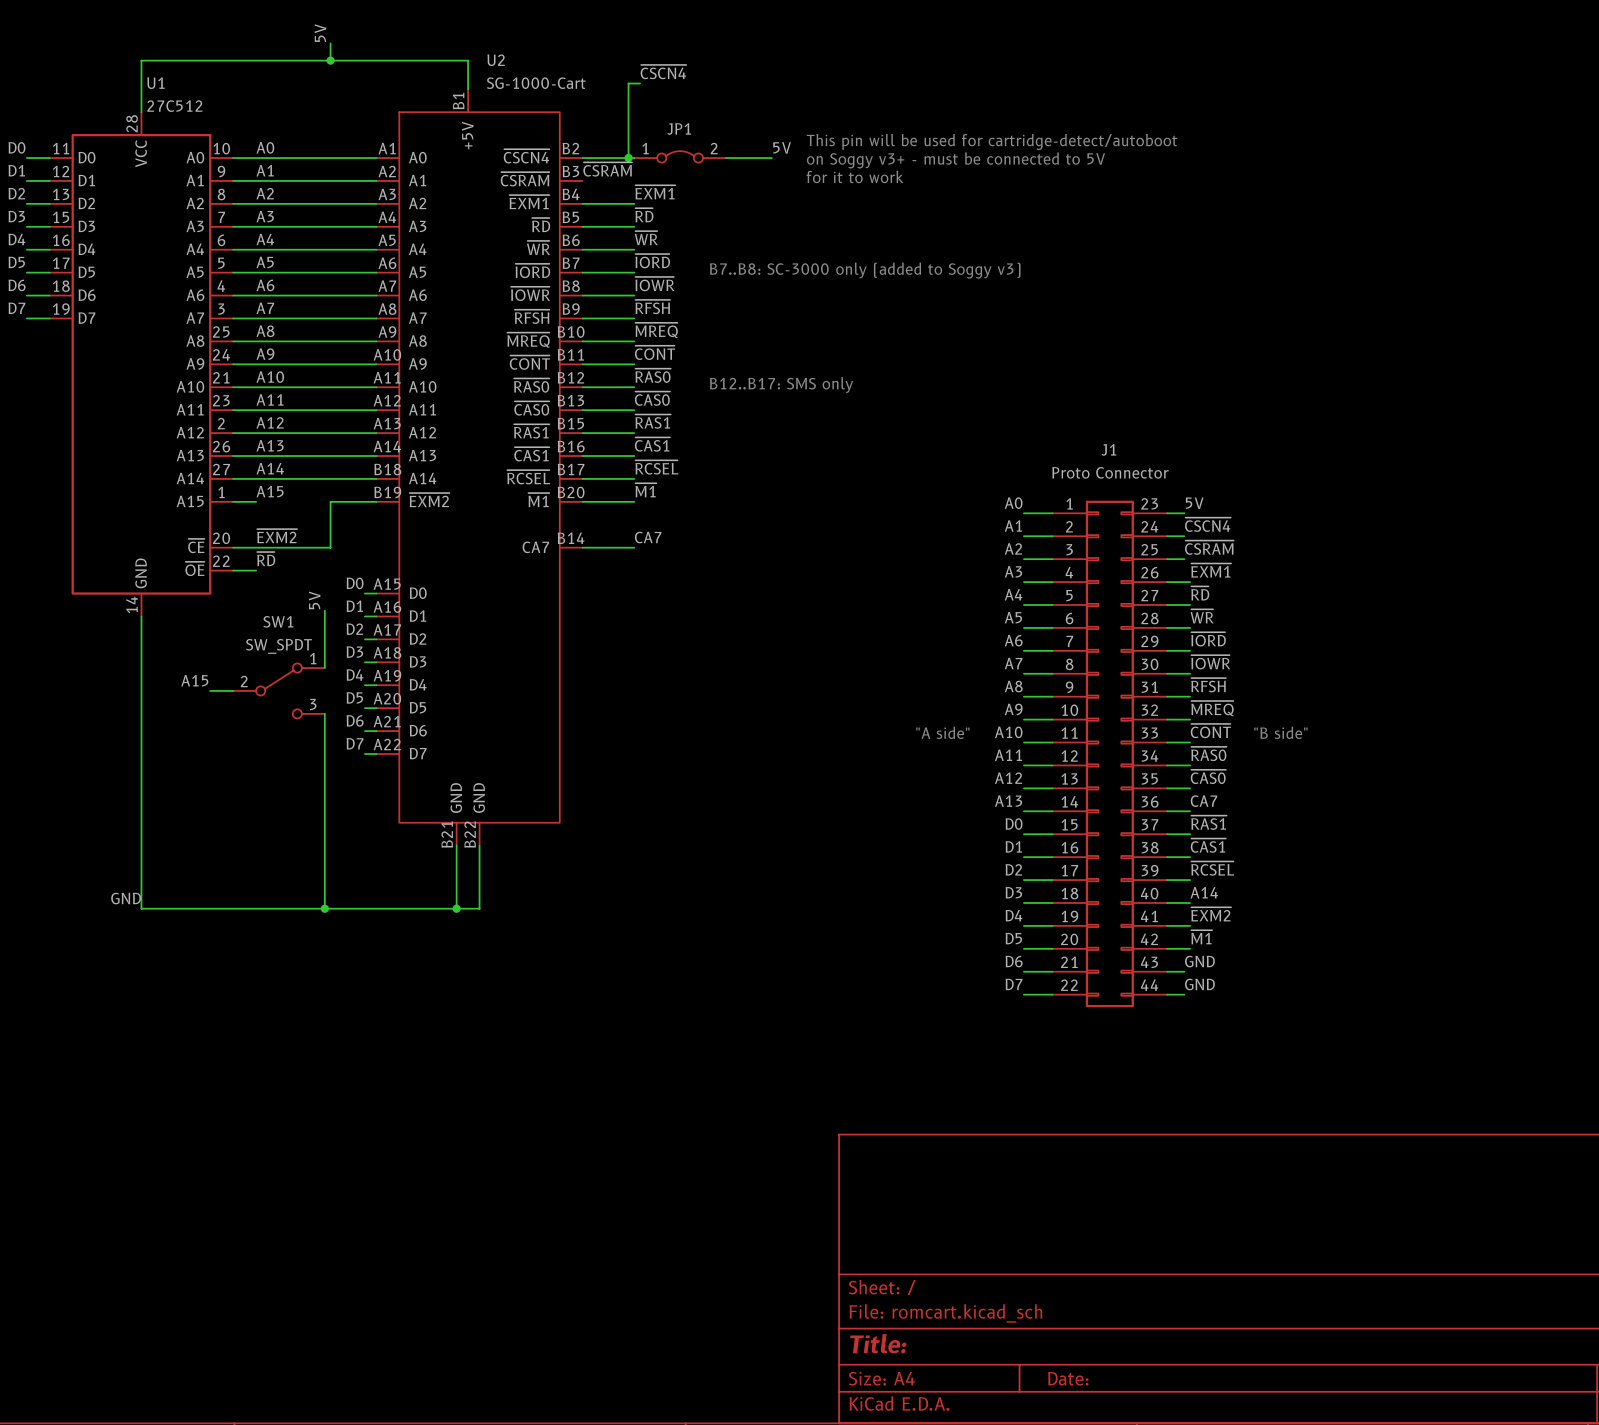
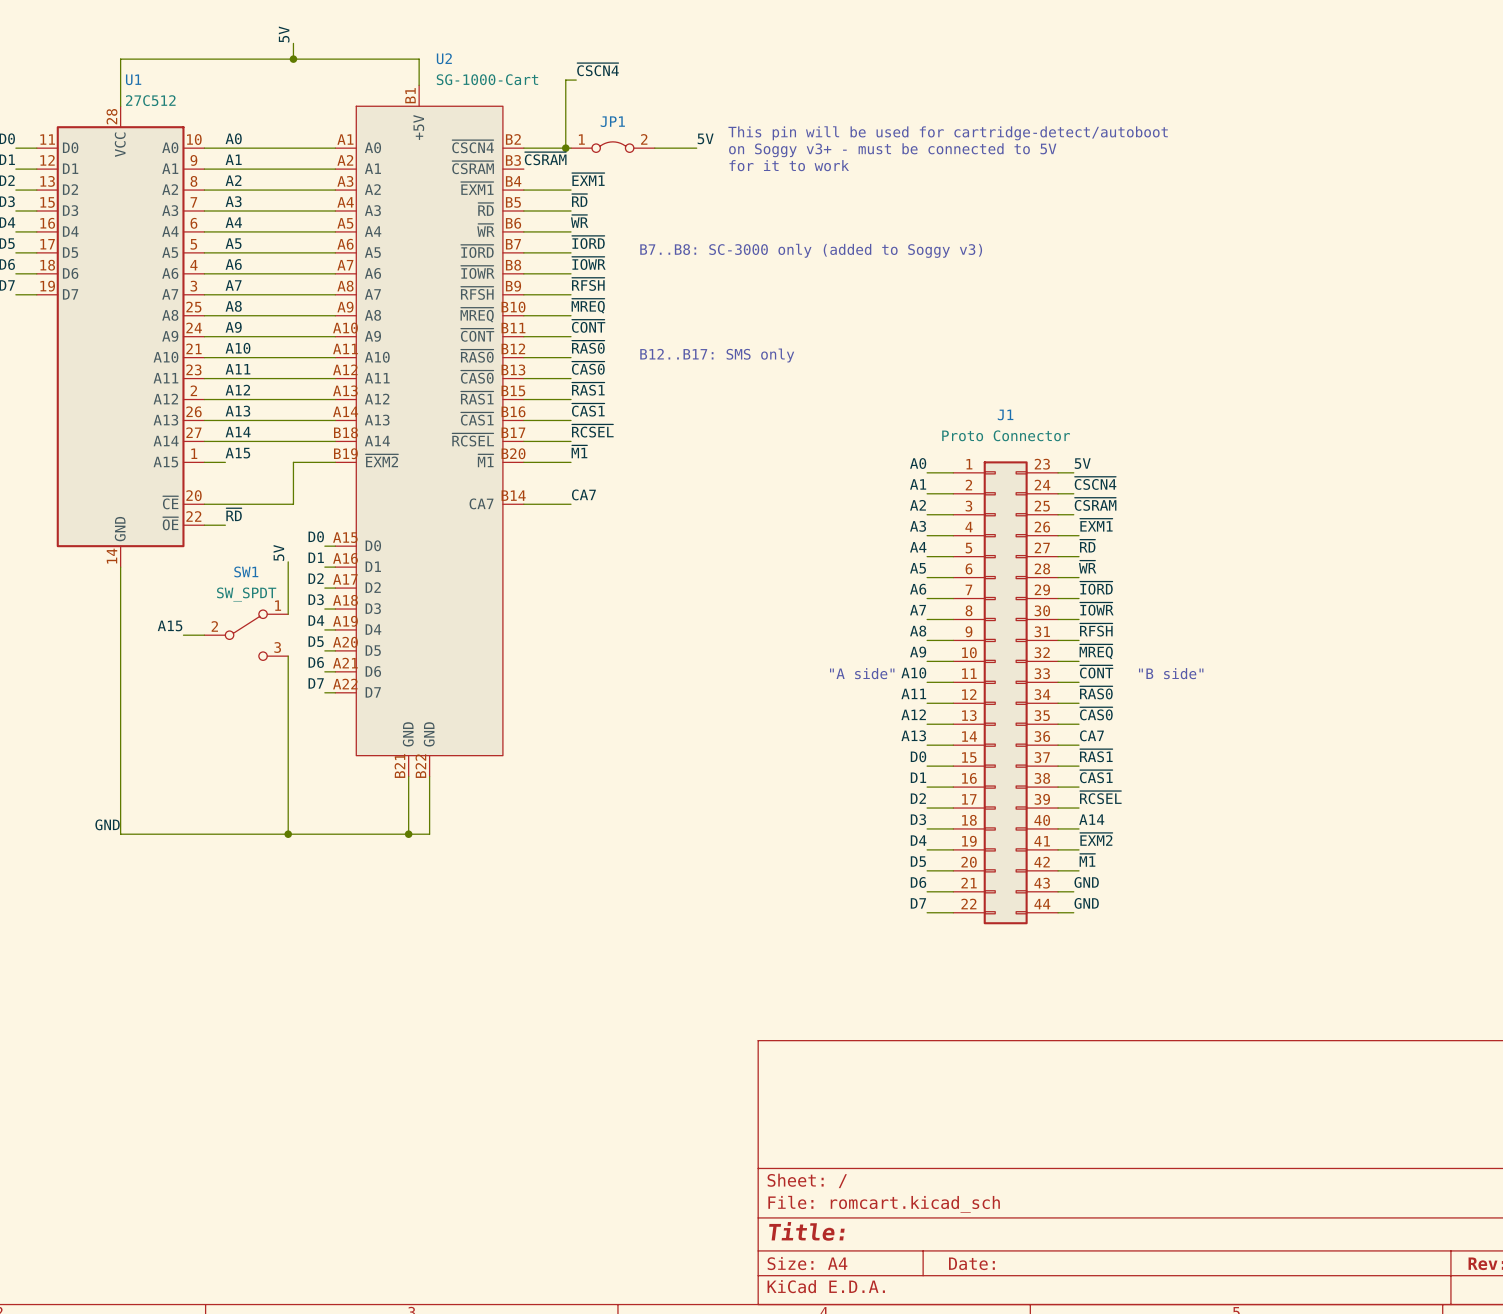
label: ~{EXM2} (277, 536) -> none

